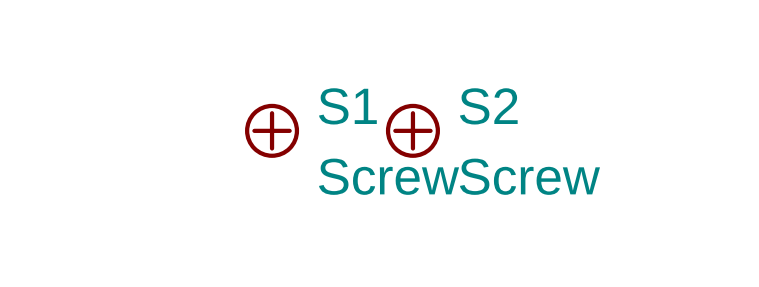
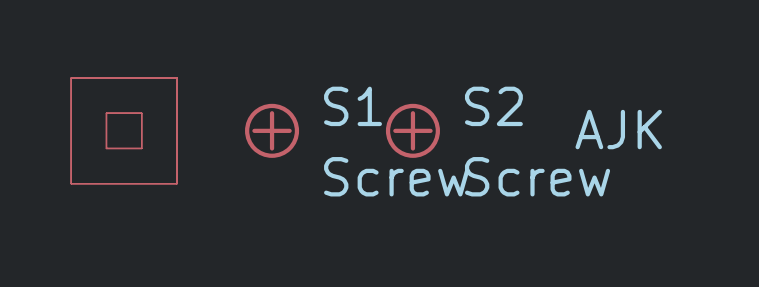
part: none -> AJK (618, 129)
part: none -> (124, 130)

